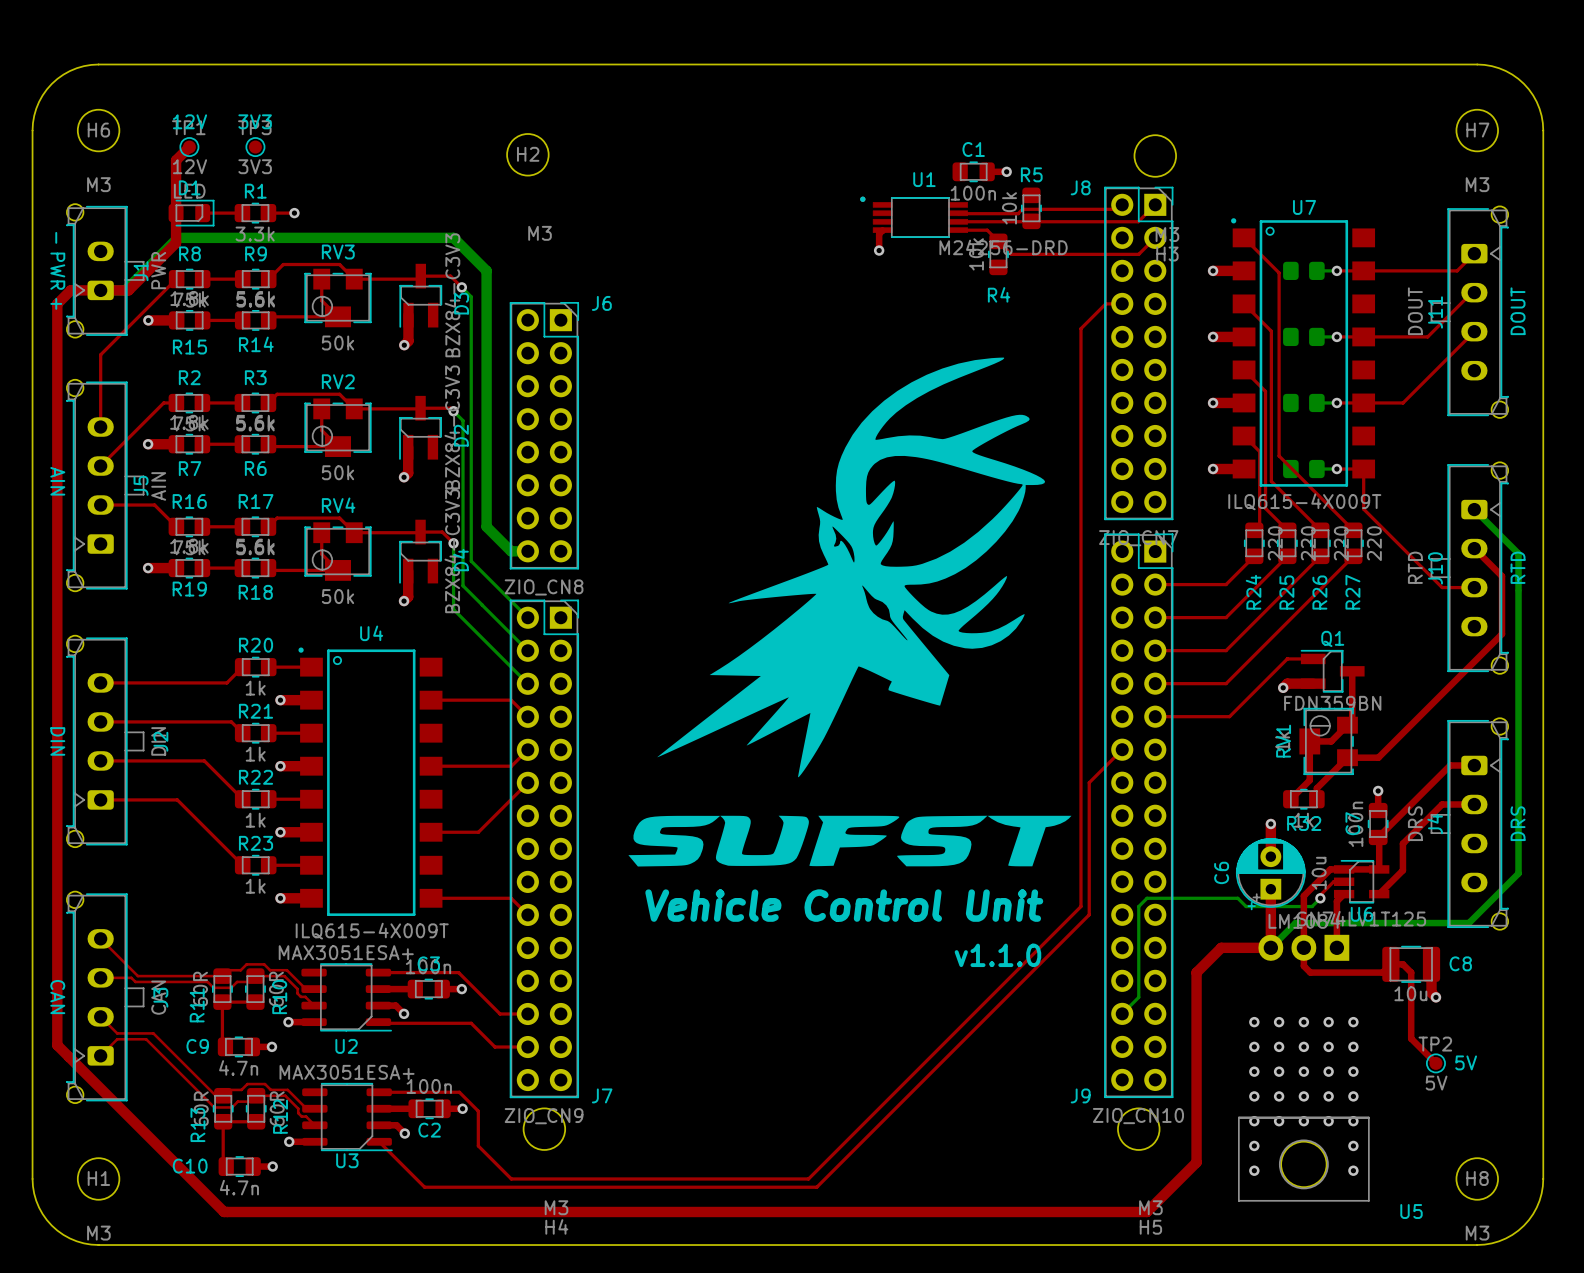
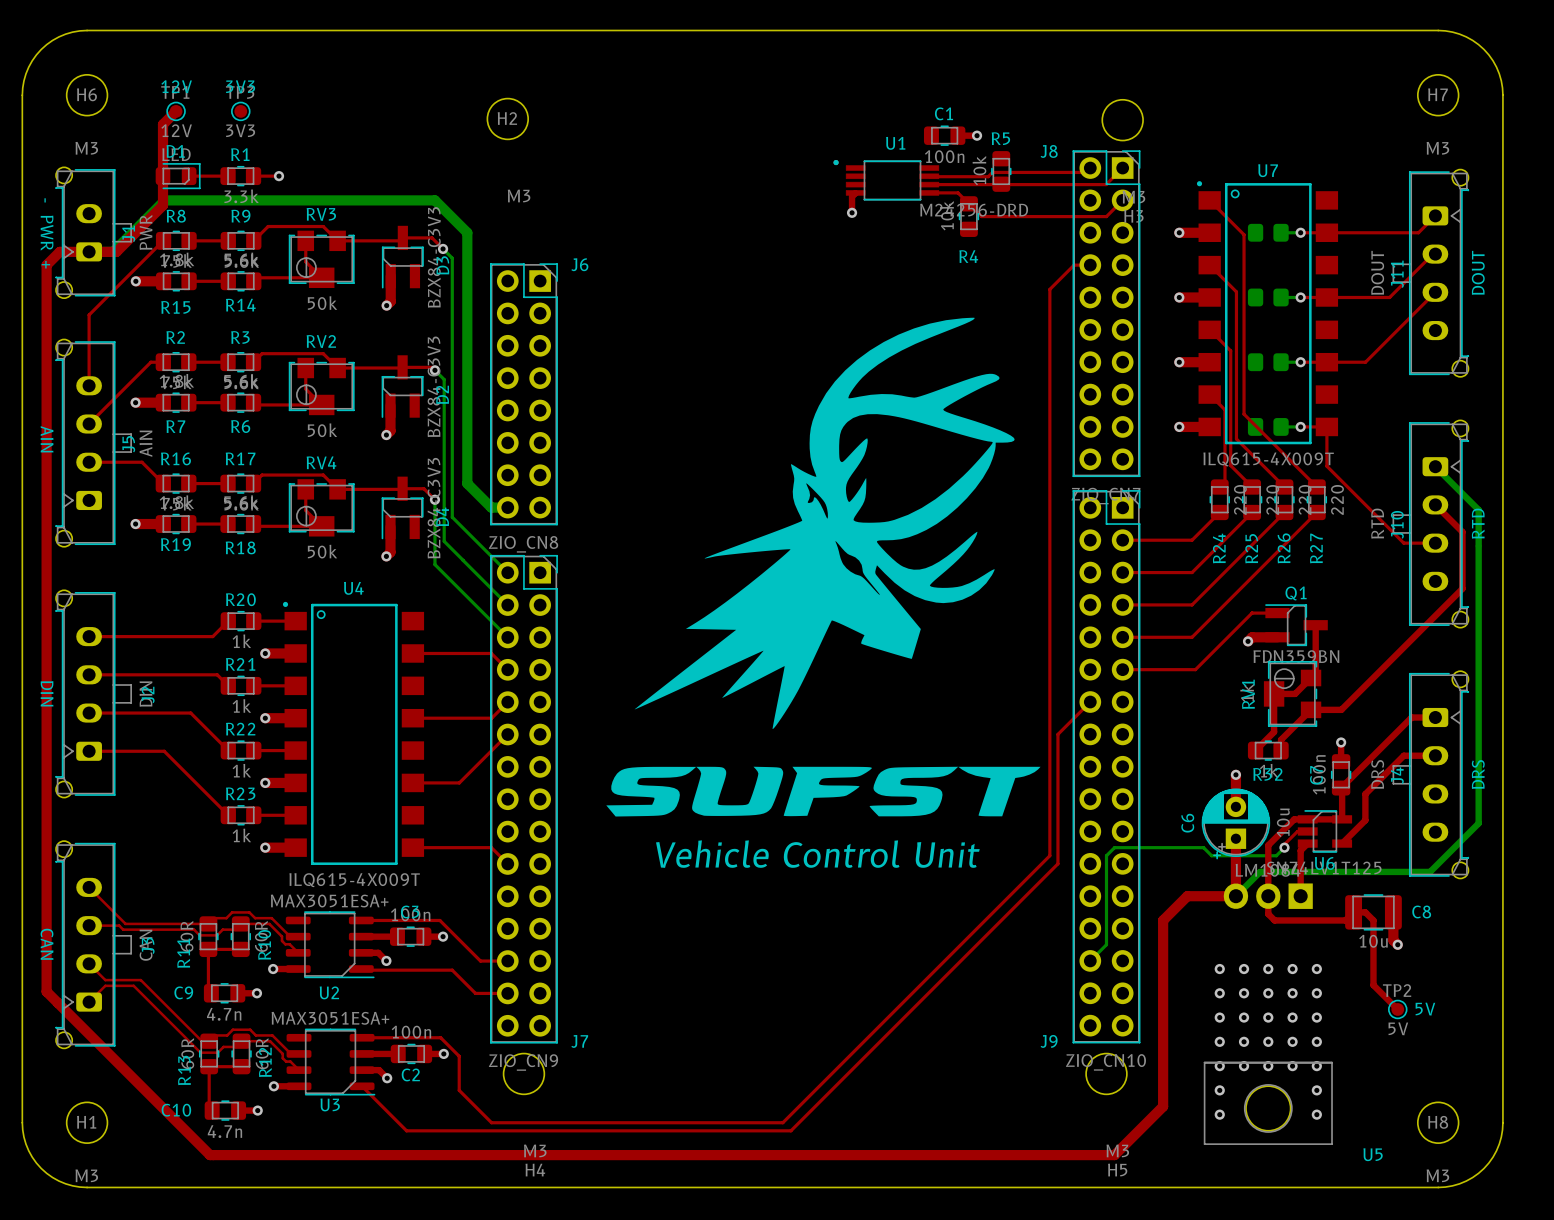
text: v1.1.0 (997, 955) -> none

